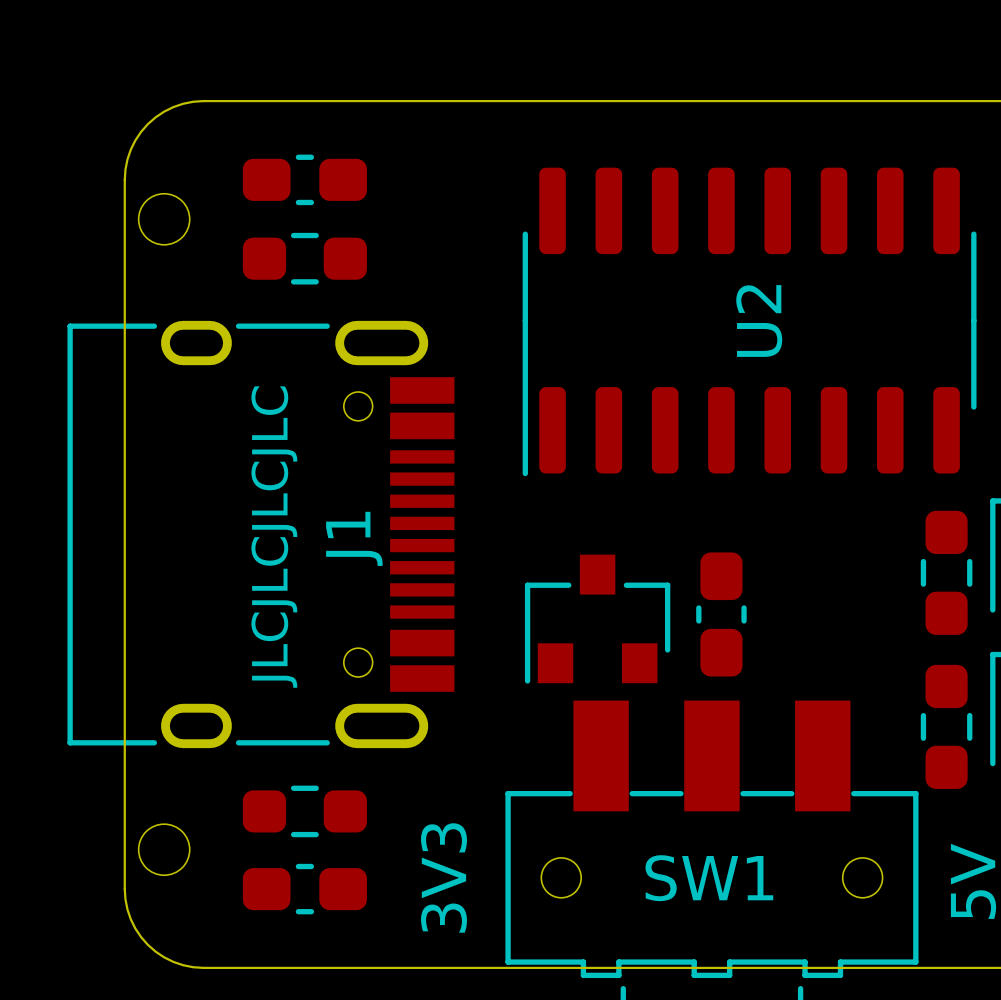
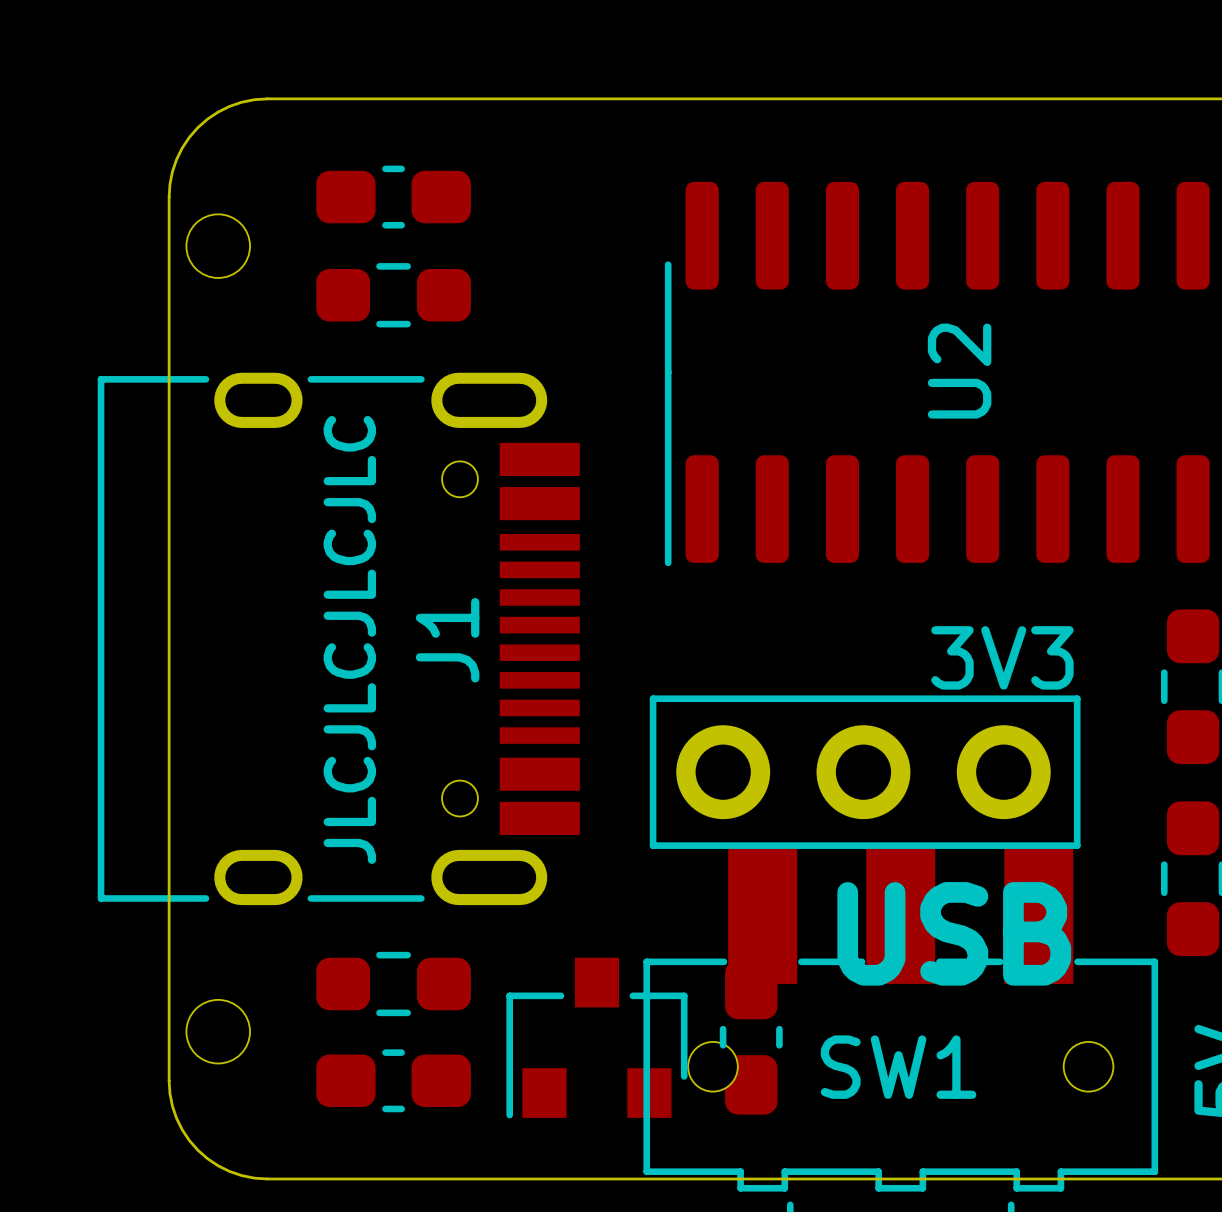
part position: (721, 614) -> (751, 1037)
part position: (597, 619) -> (596, 1038)
part: none -> (865, 772)
text: none -> USB (954, 933)
text rotation: 0° (444, 877) -> 90° clockwise (1002, 657)
text position: 3V3 (444, 877) -> 3V3 (1002, 657)

